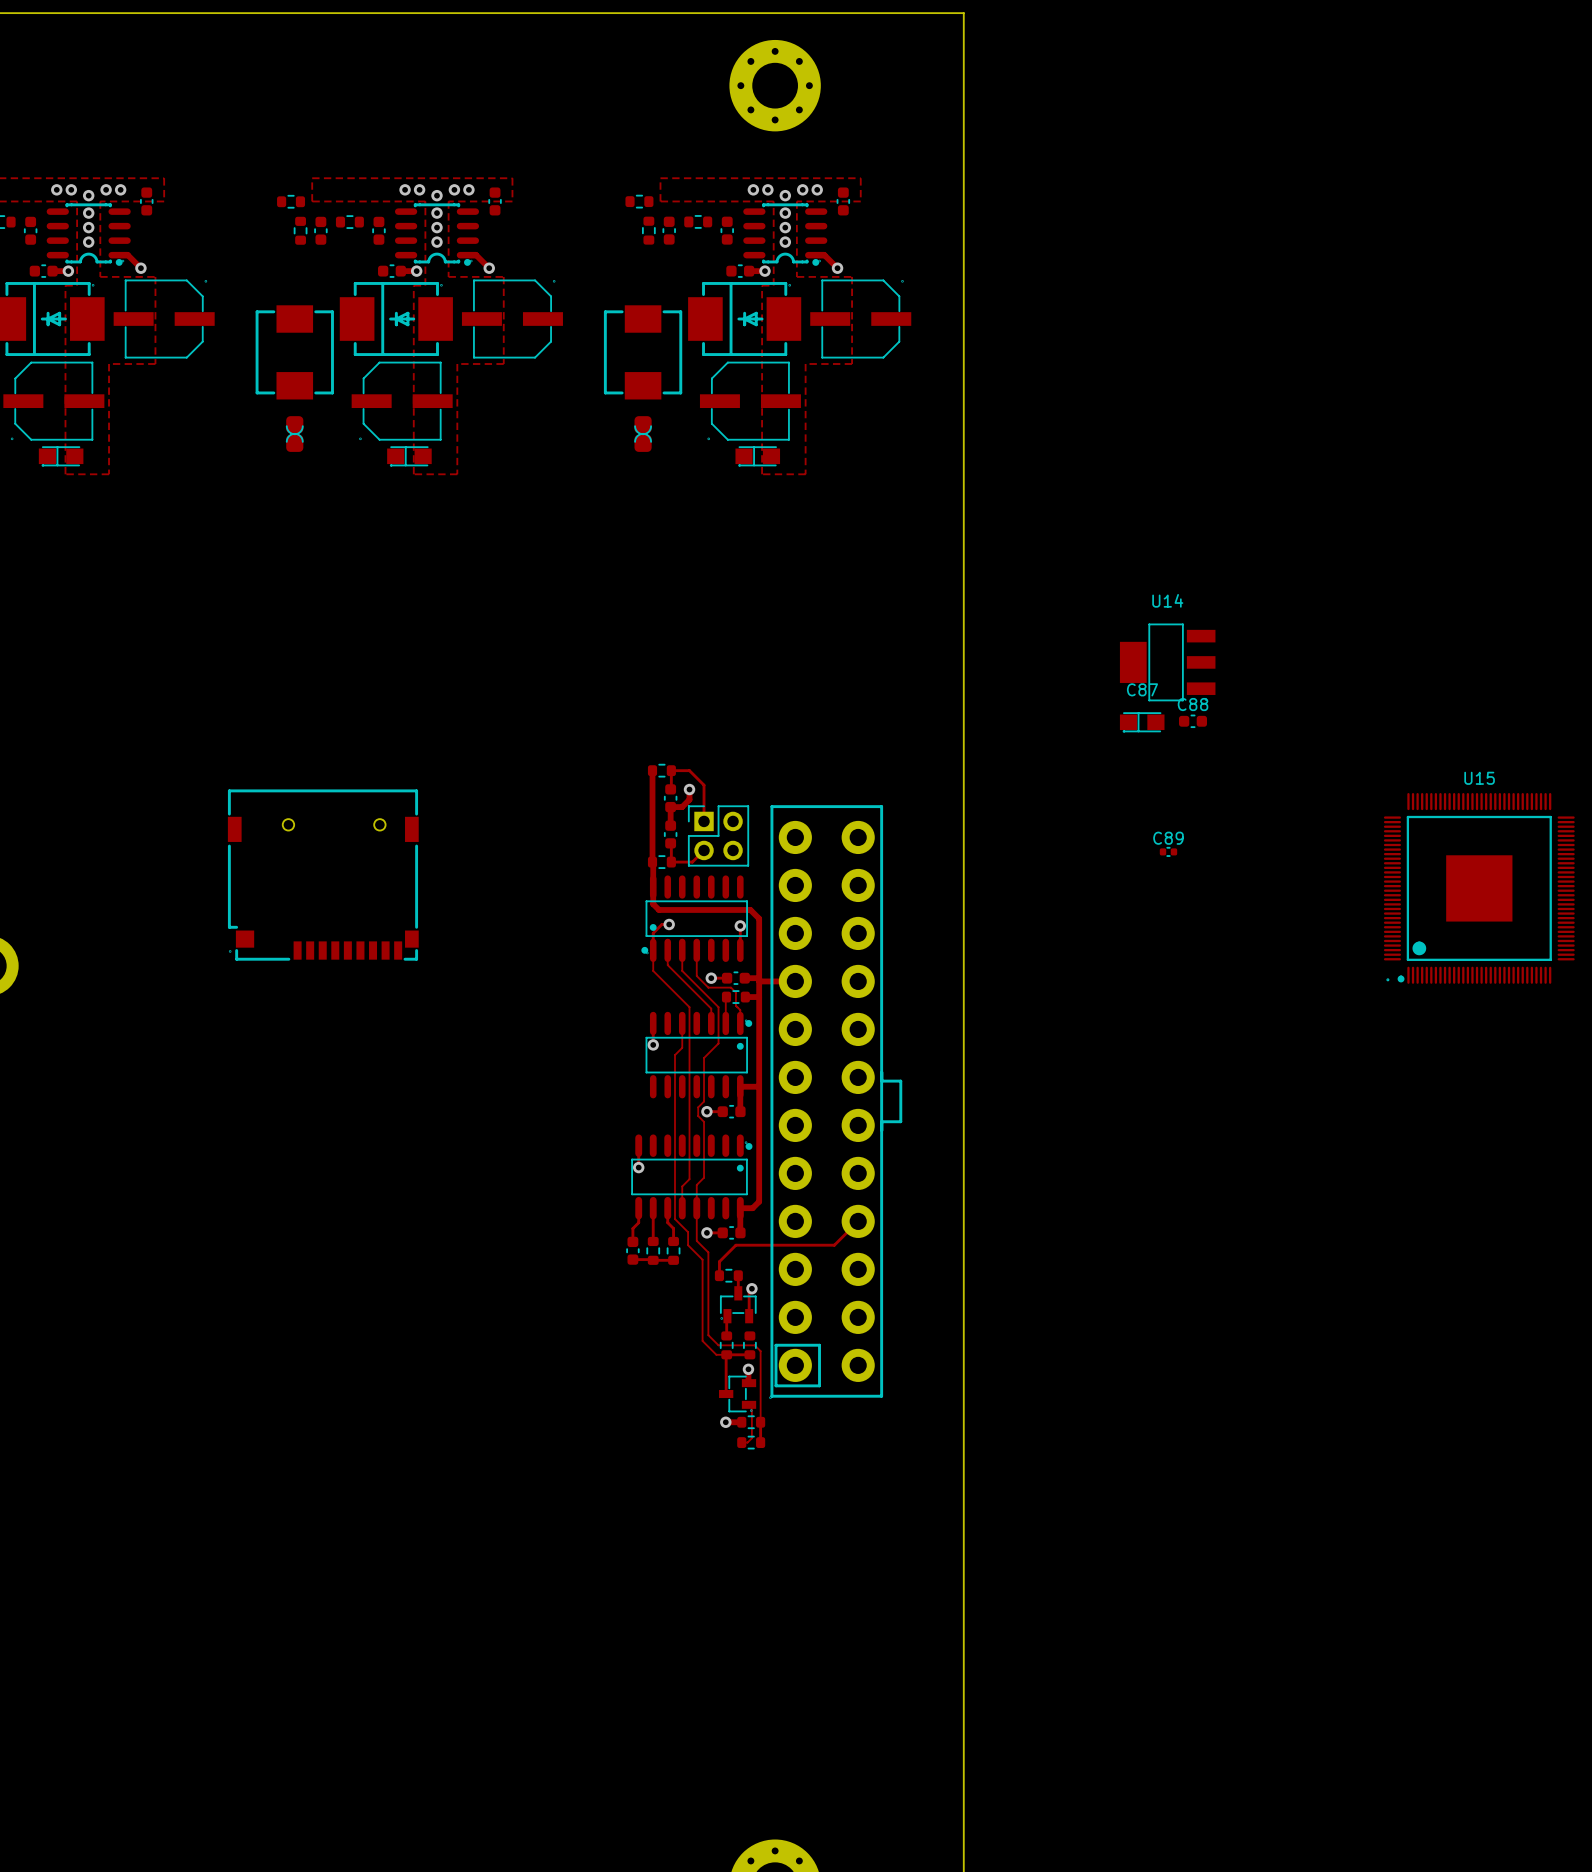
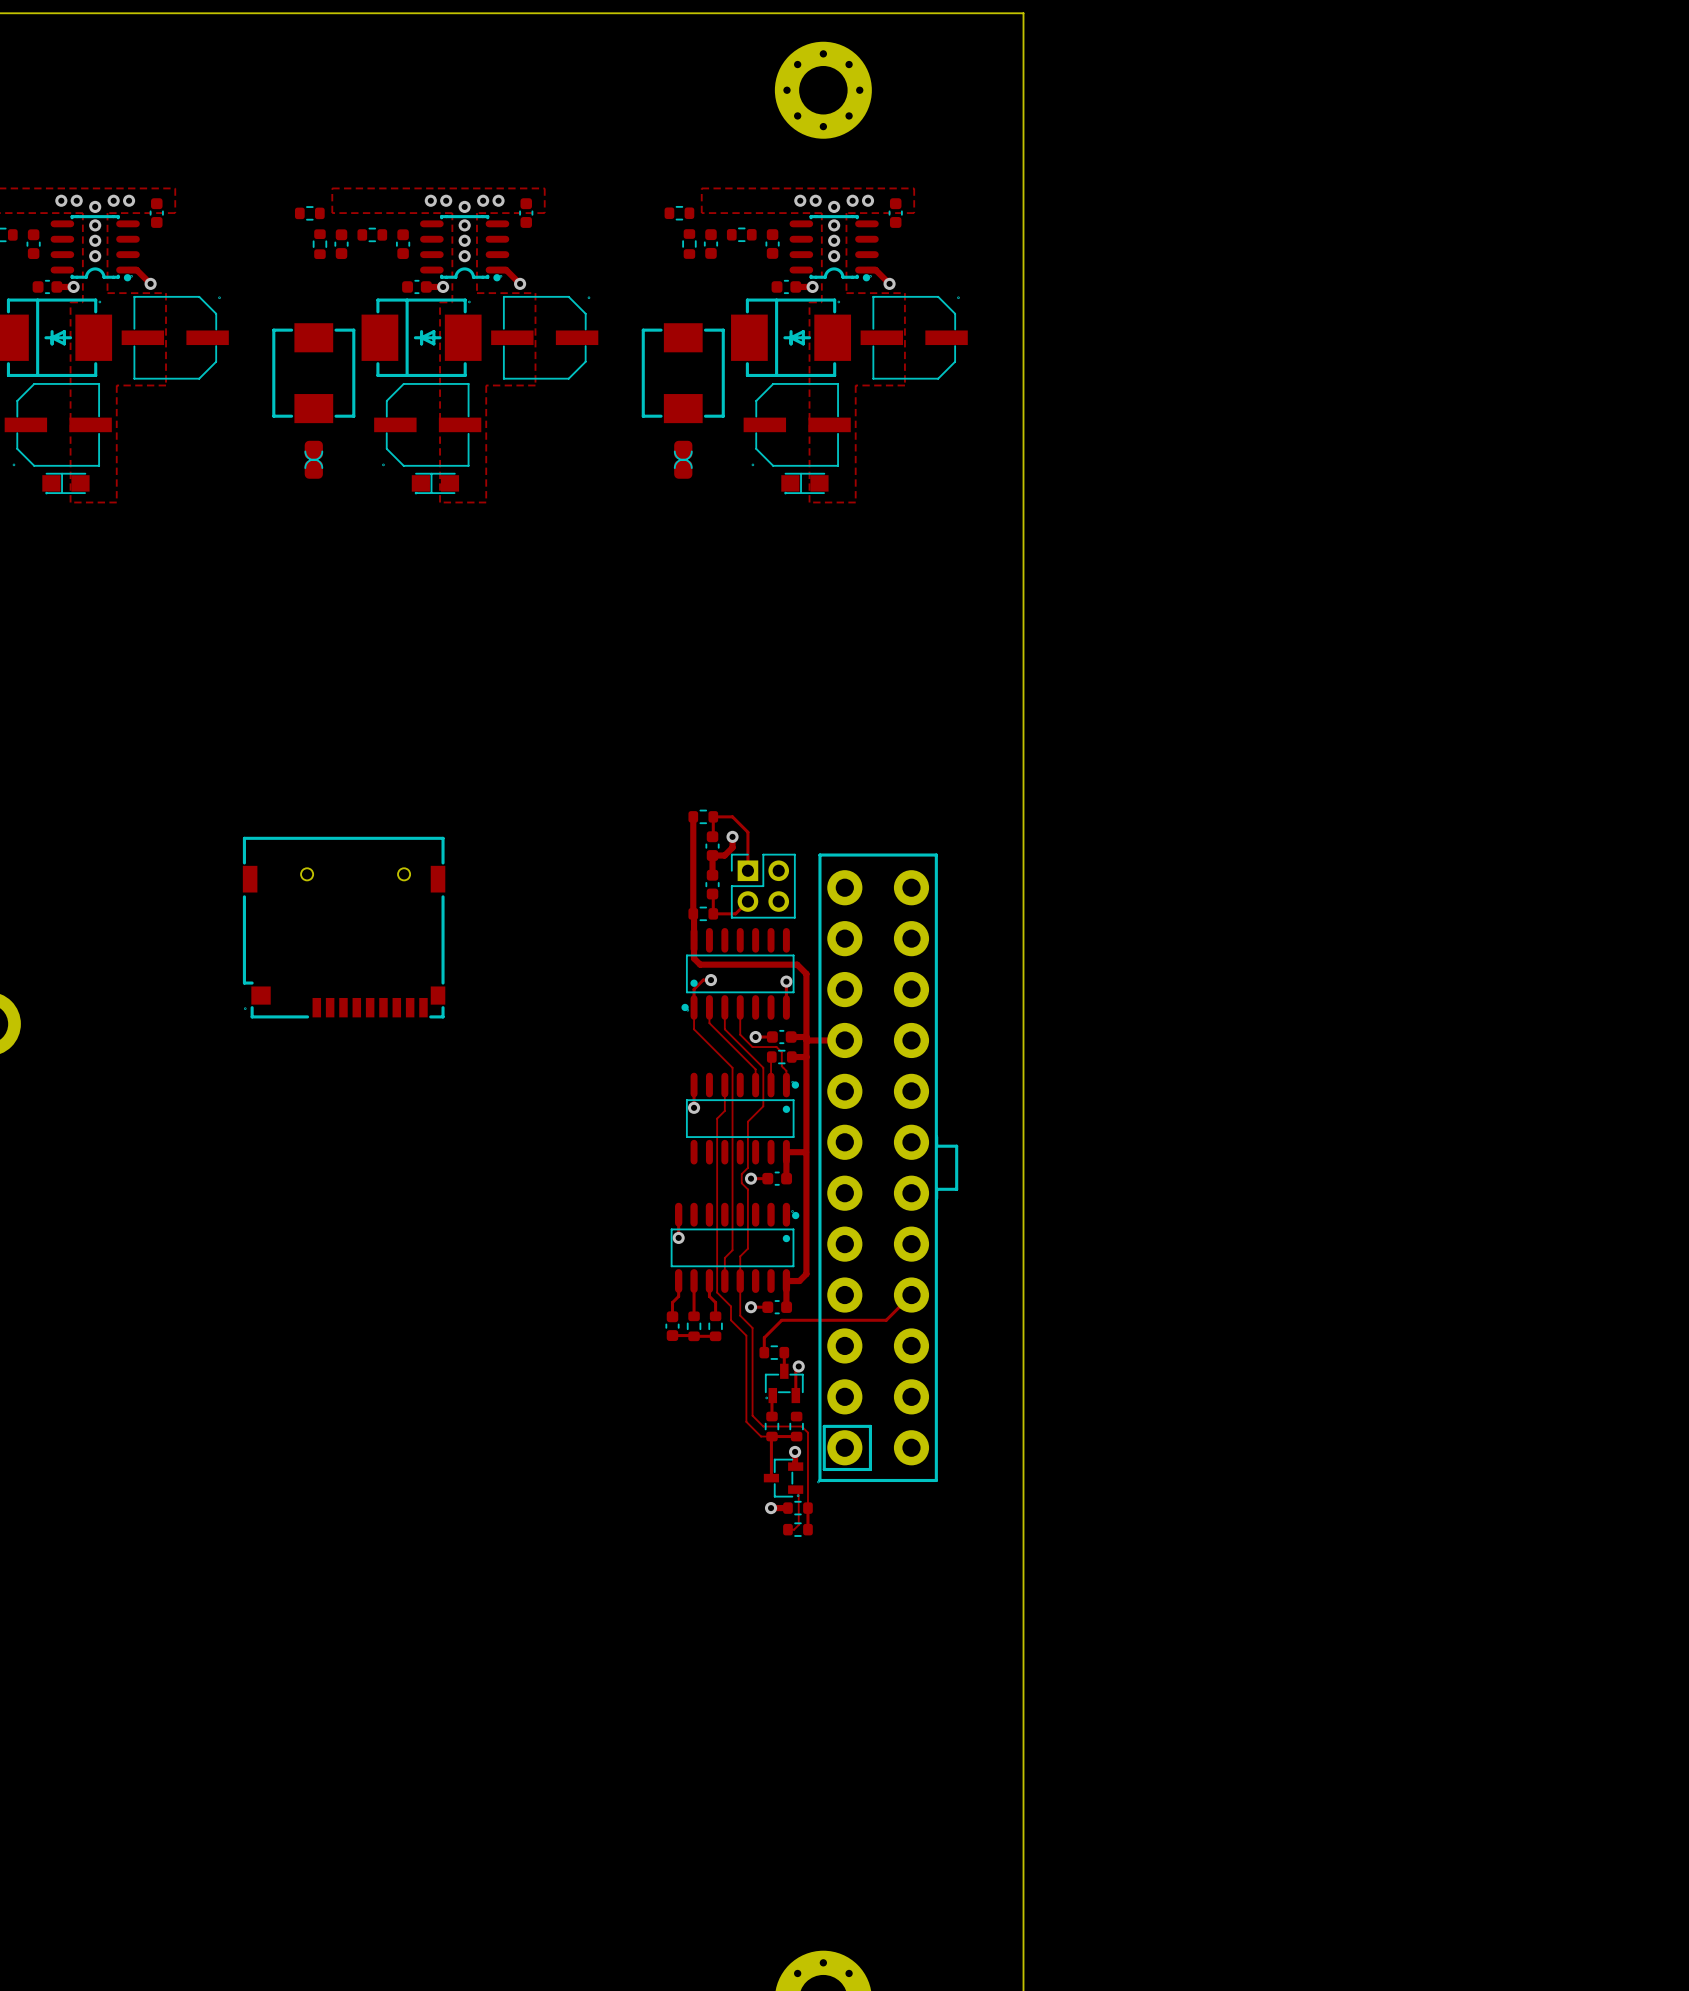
U14: (1167, 662) -> none
C88: (1193, 721) -> none
C87: (1142, 722) -> none
C89: (1168, 851) -> none
U15: (1479, 888) -> none

